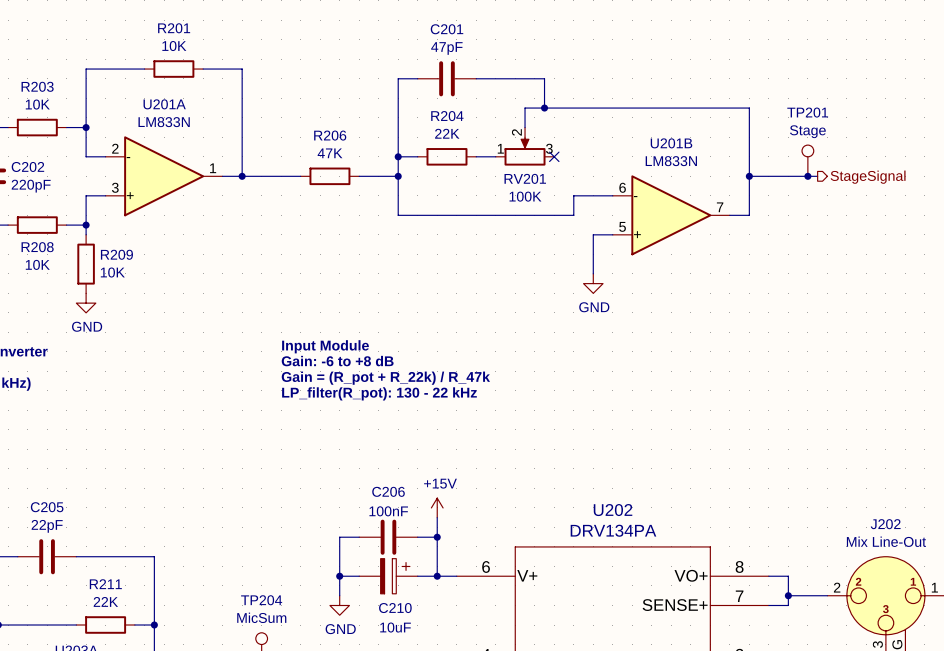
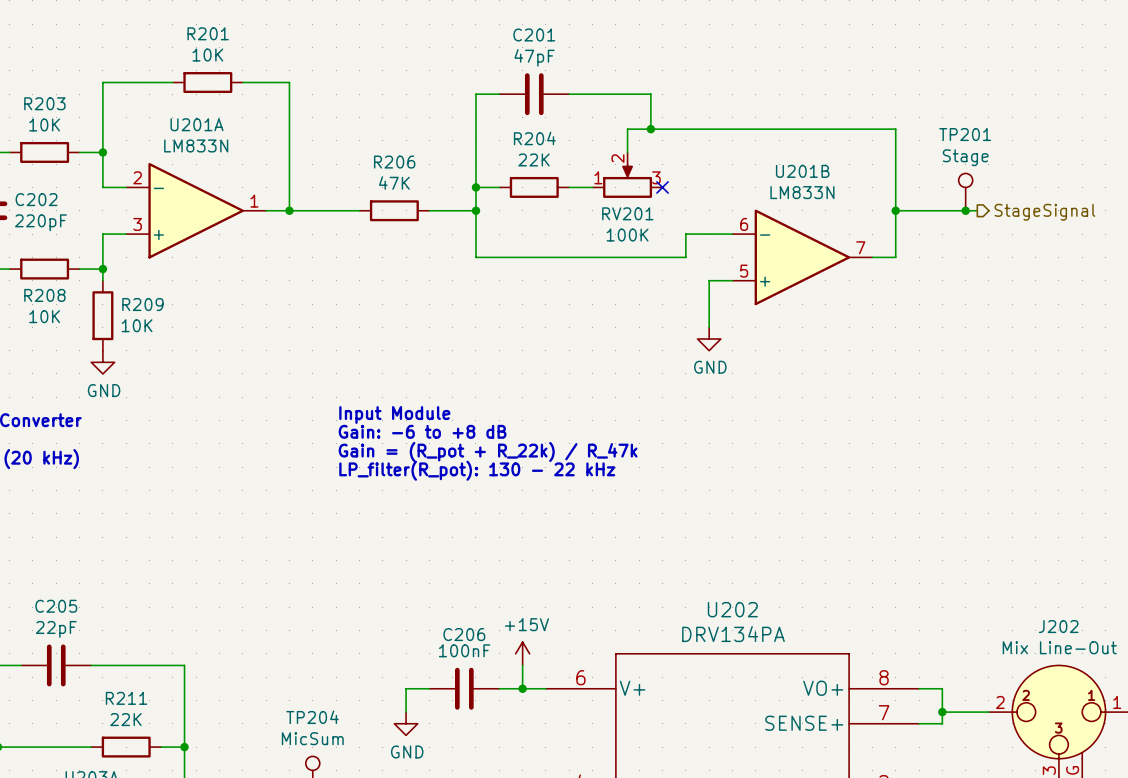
power symbol position: +15V (437, 507) -> +15V (522, 653)
C206 value position: 100nF (388, 511) -> 100nF (464, 650)
wire: (359, 537) (339, 537) (339, 576) -> none
C206 position: (388, 537) -> (464, 688)
wire: (417, 537) (437, 537) -> none
junction: (437, 537) -> none
junction: (339, 576) -> none
C210: 10uF (388, 576) -> none

